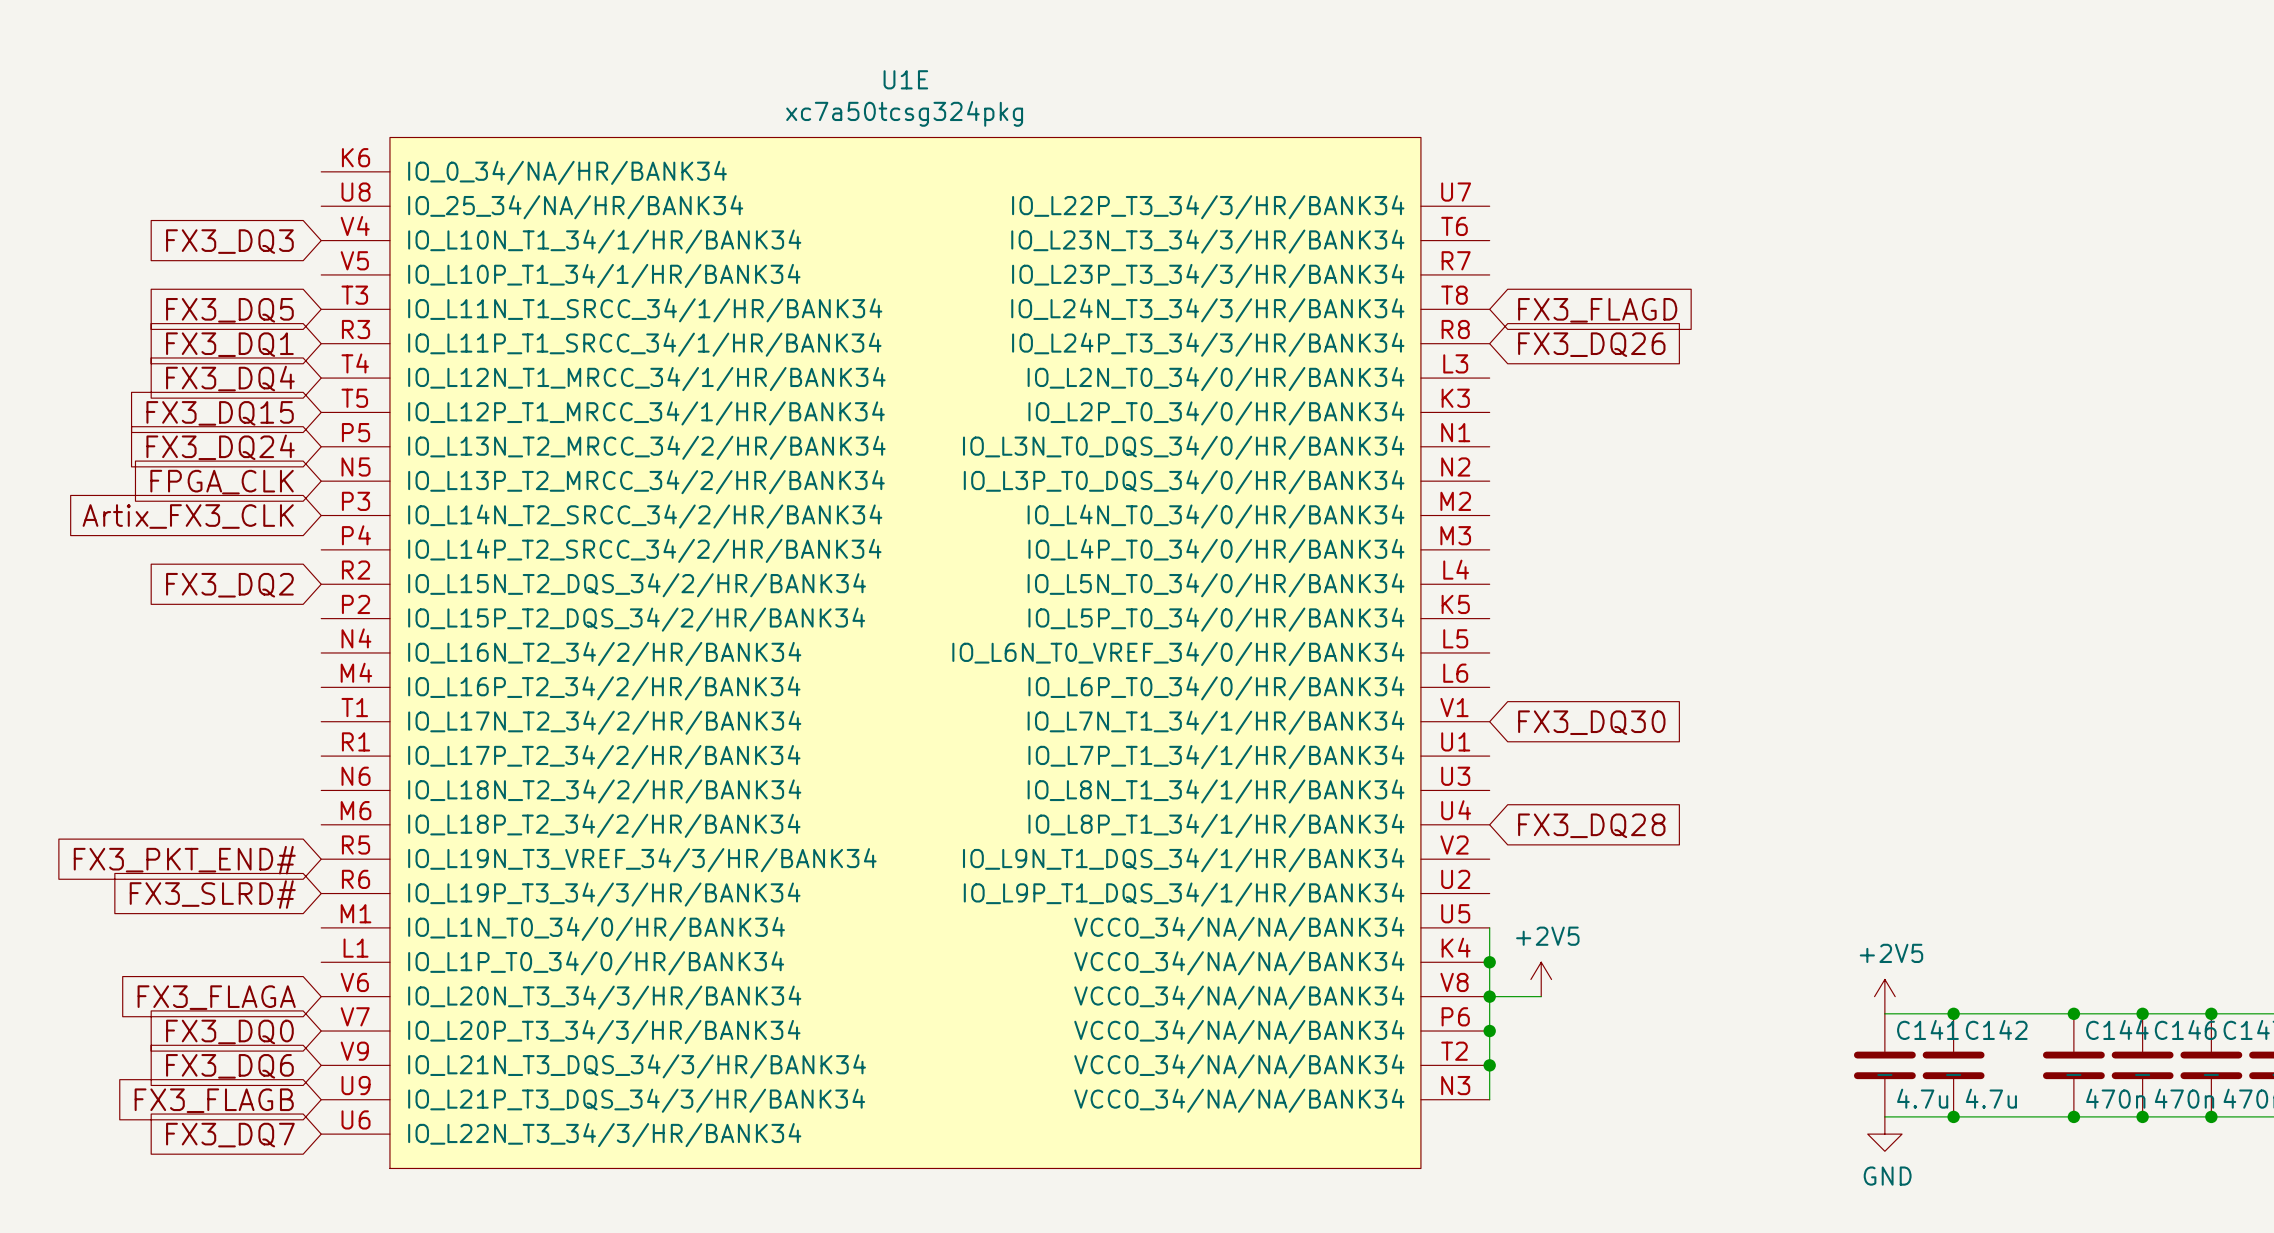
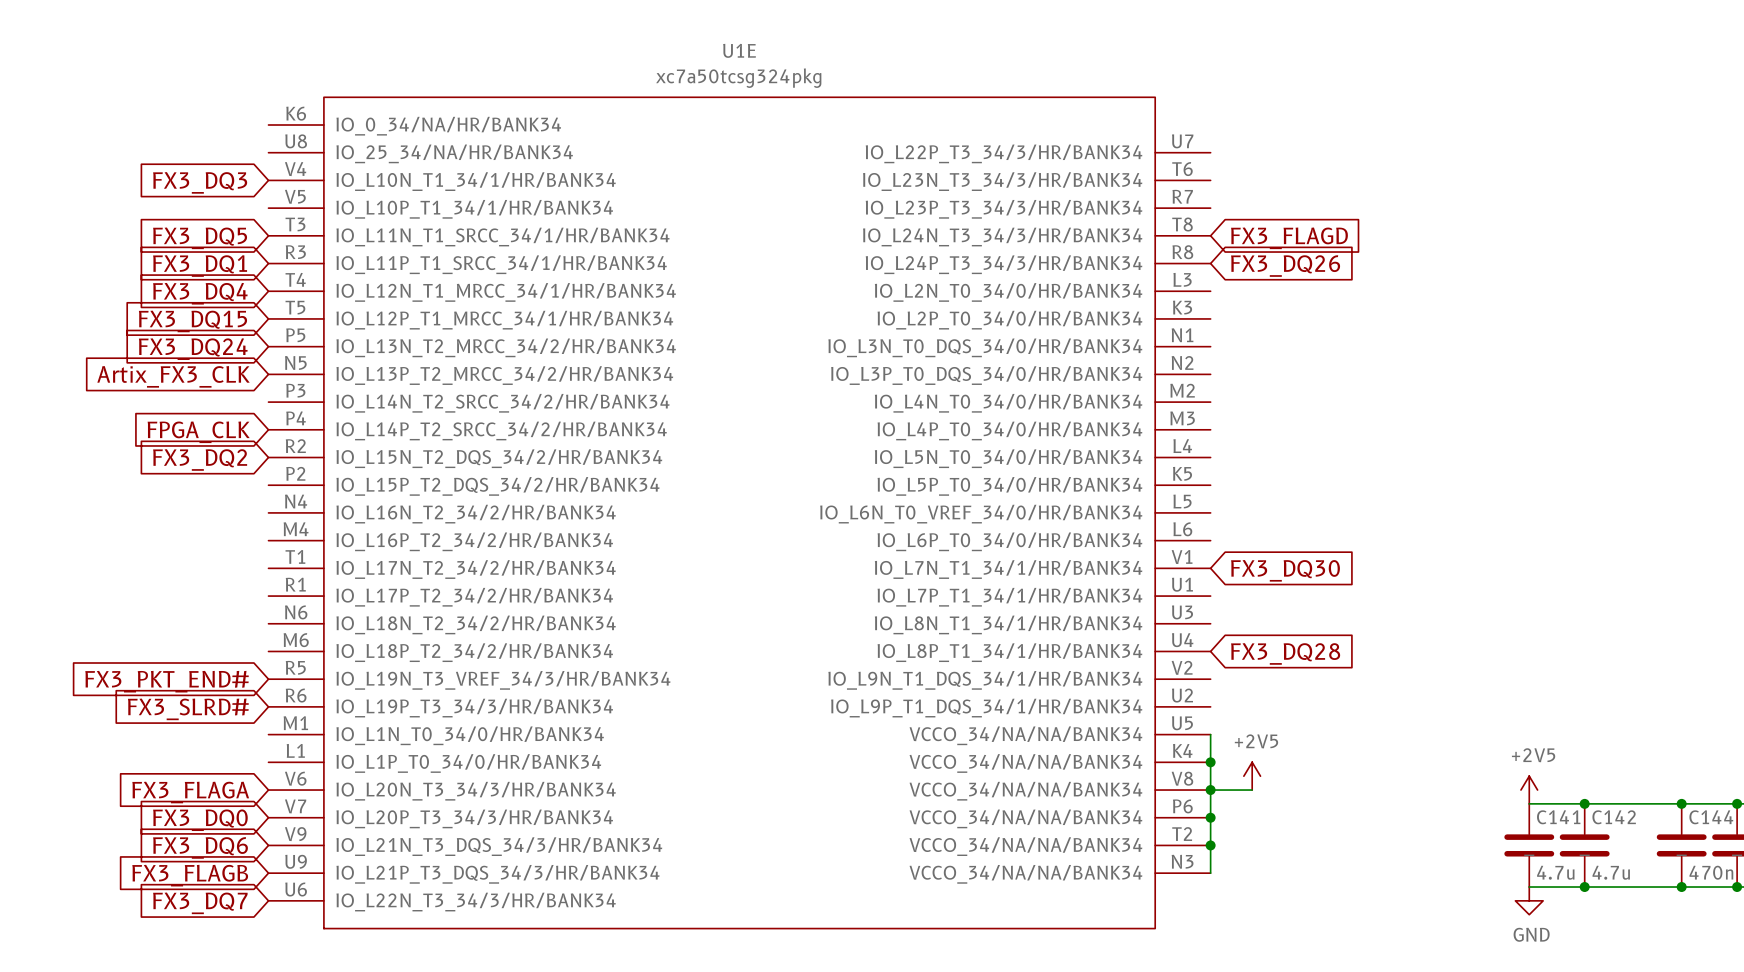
global label: FPGA_CLK (222, 482) -> Artix_FX3_CLK (173, 376)
global label: Artix_FX3_CLK (188, 516) -> none
global label: none -> FPGA_CLK (198, 432)

